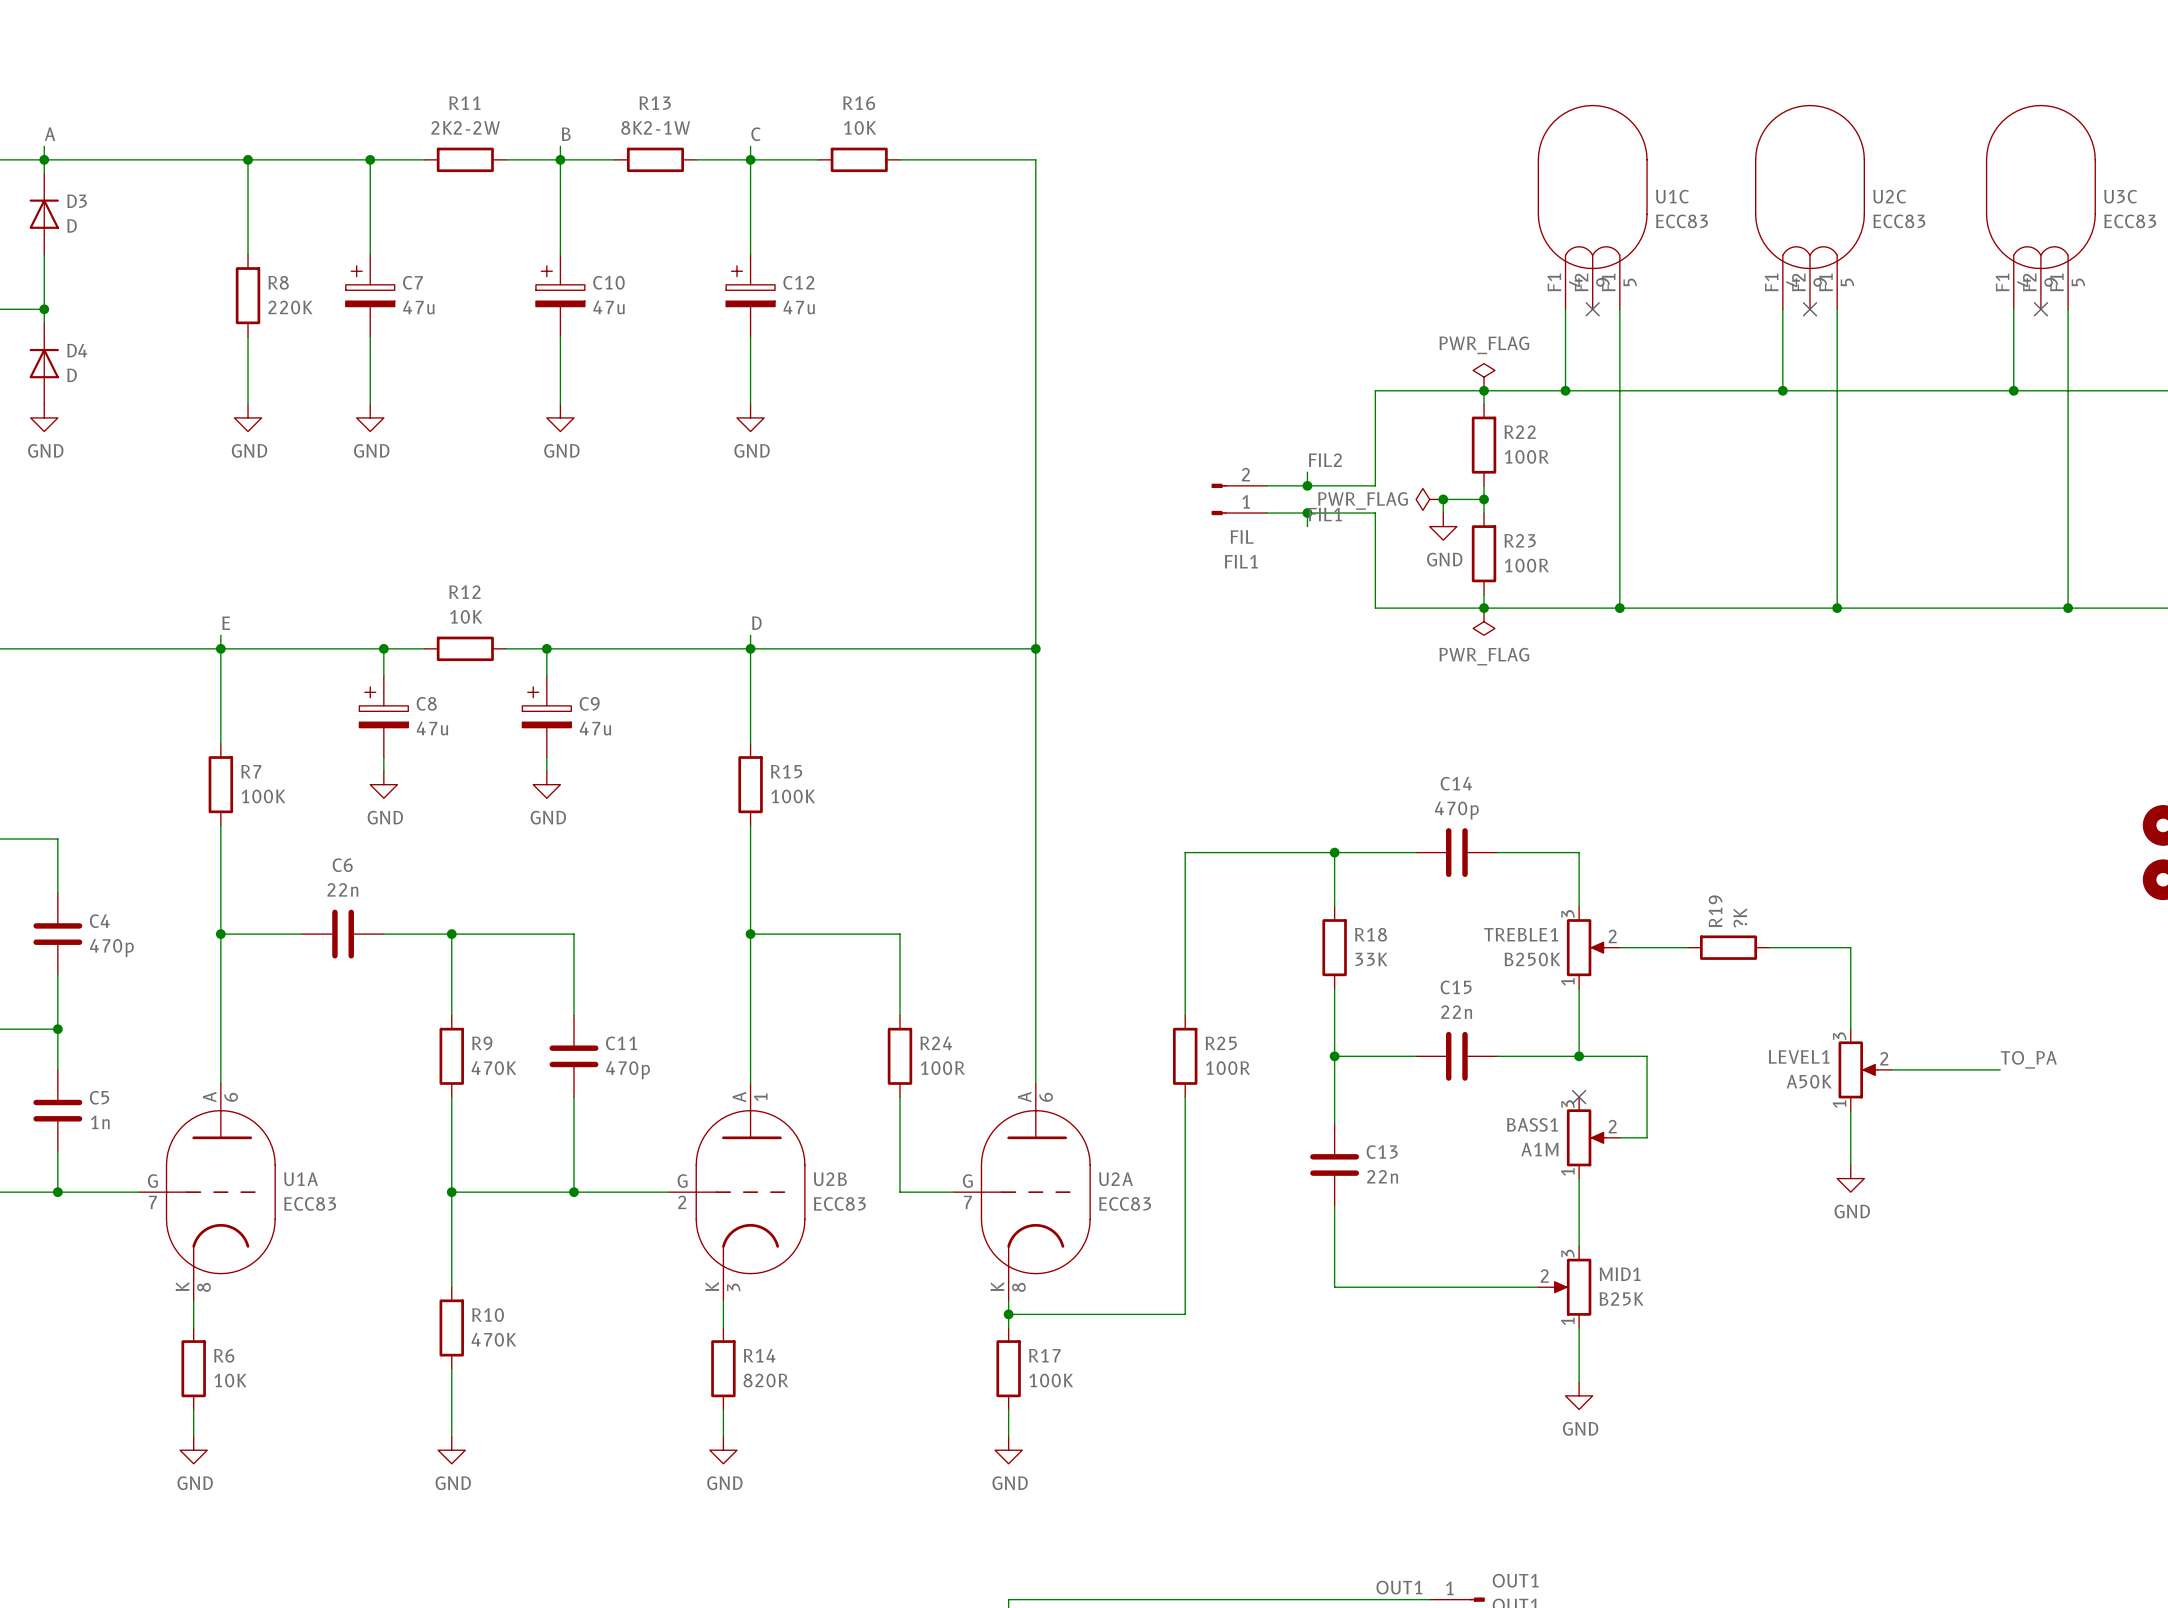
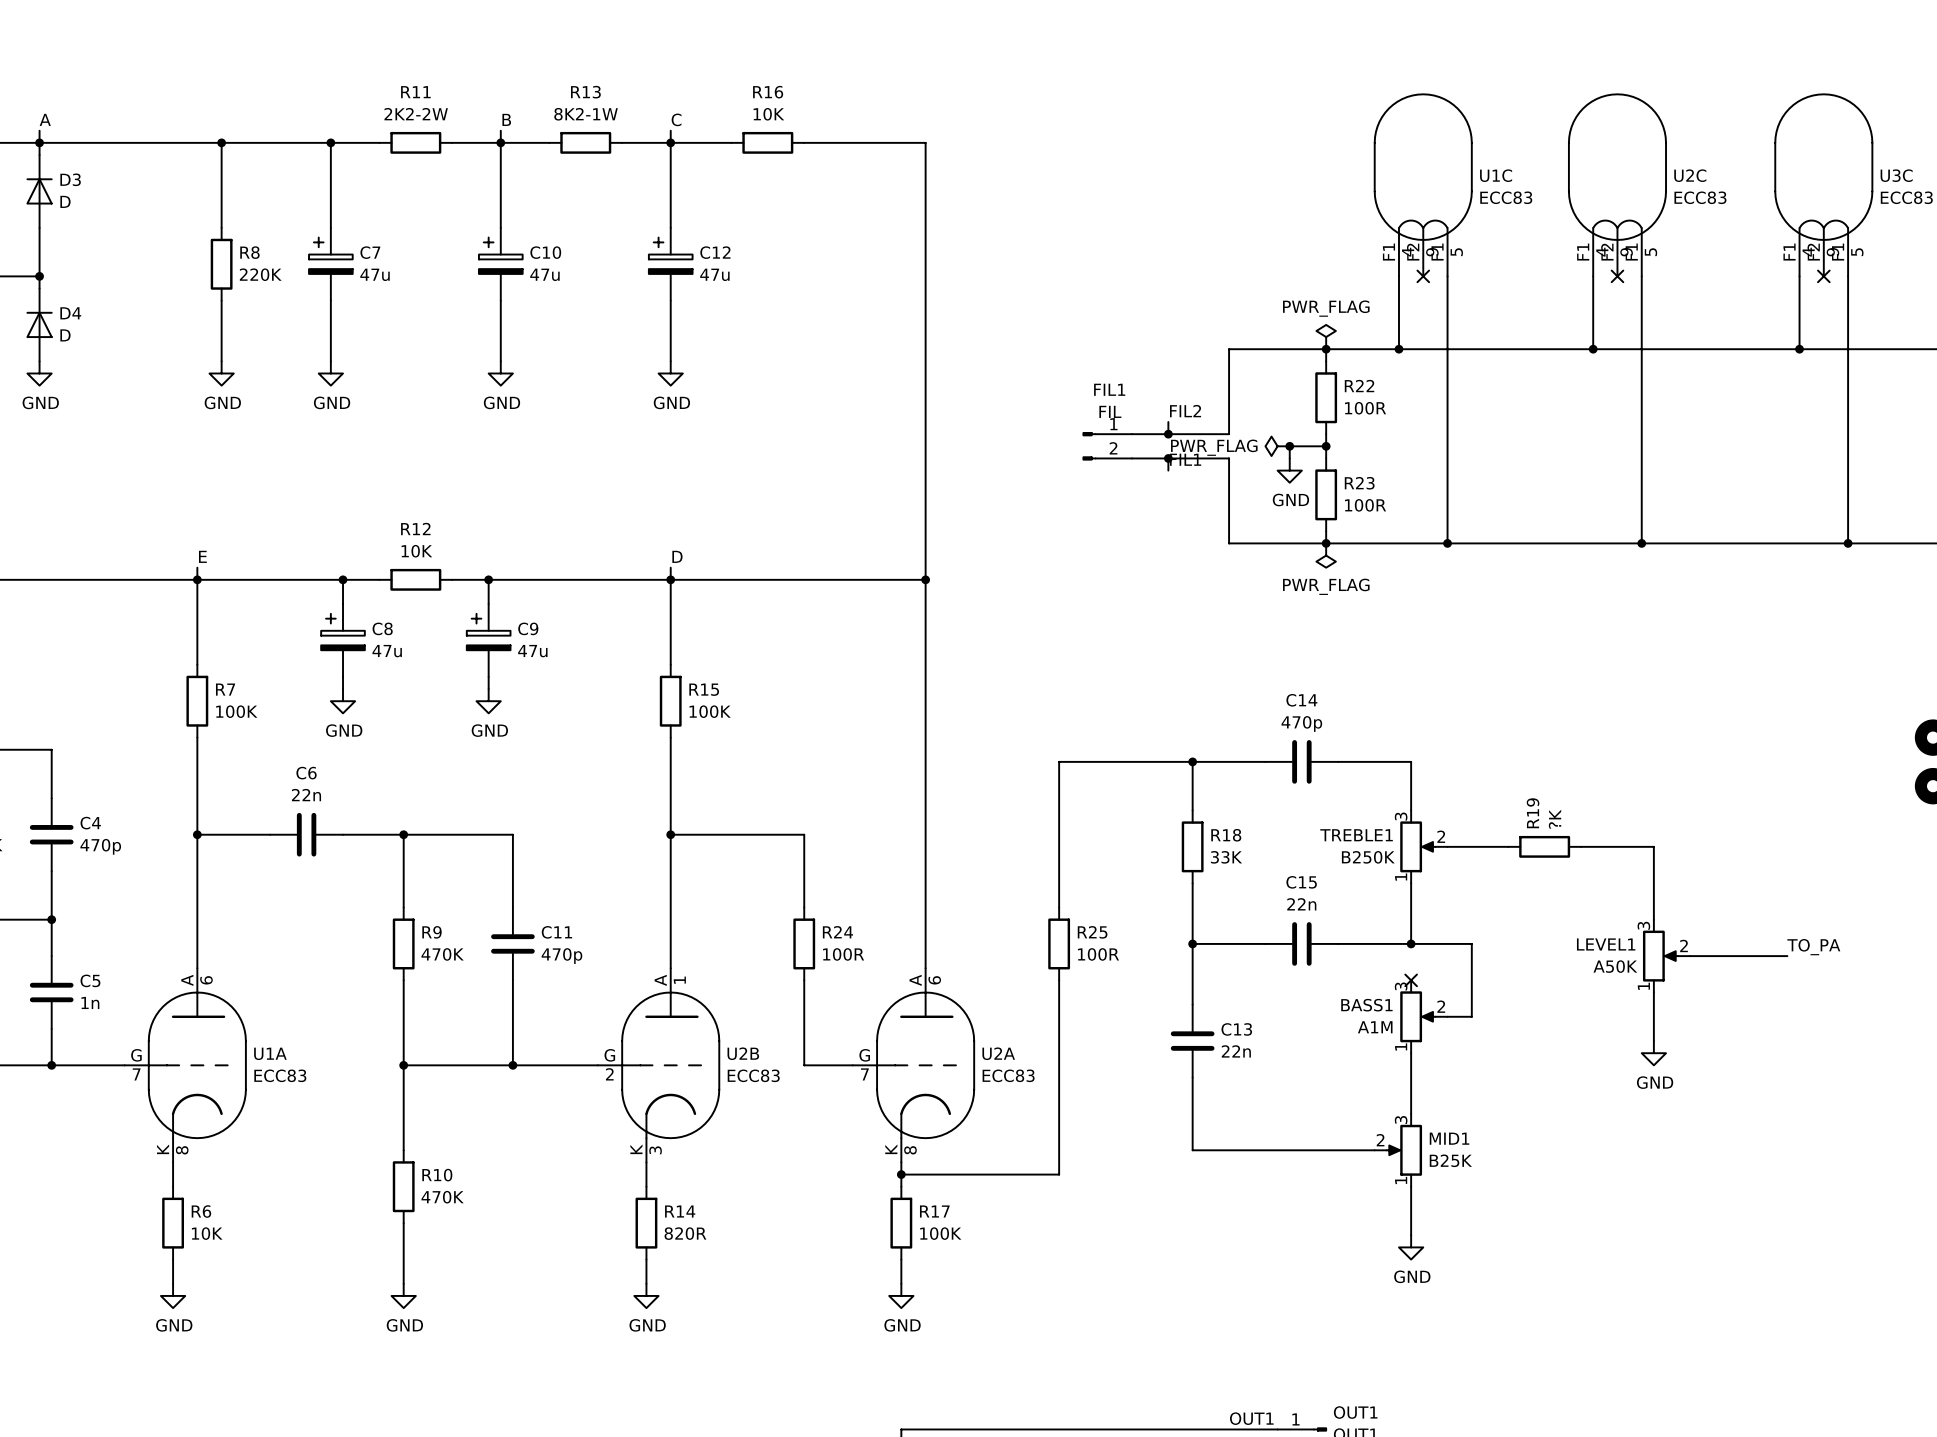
FIL1 flip: as is (1219, 499) -> up-down (1089, 446)

